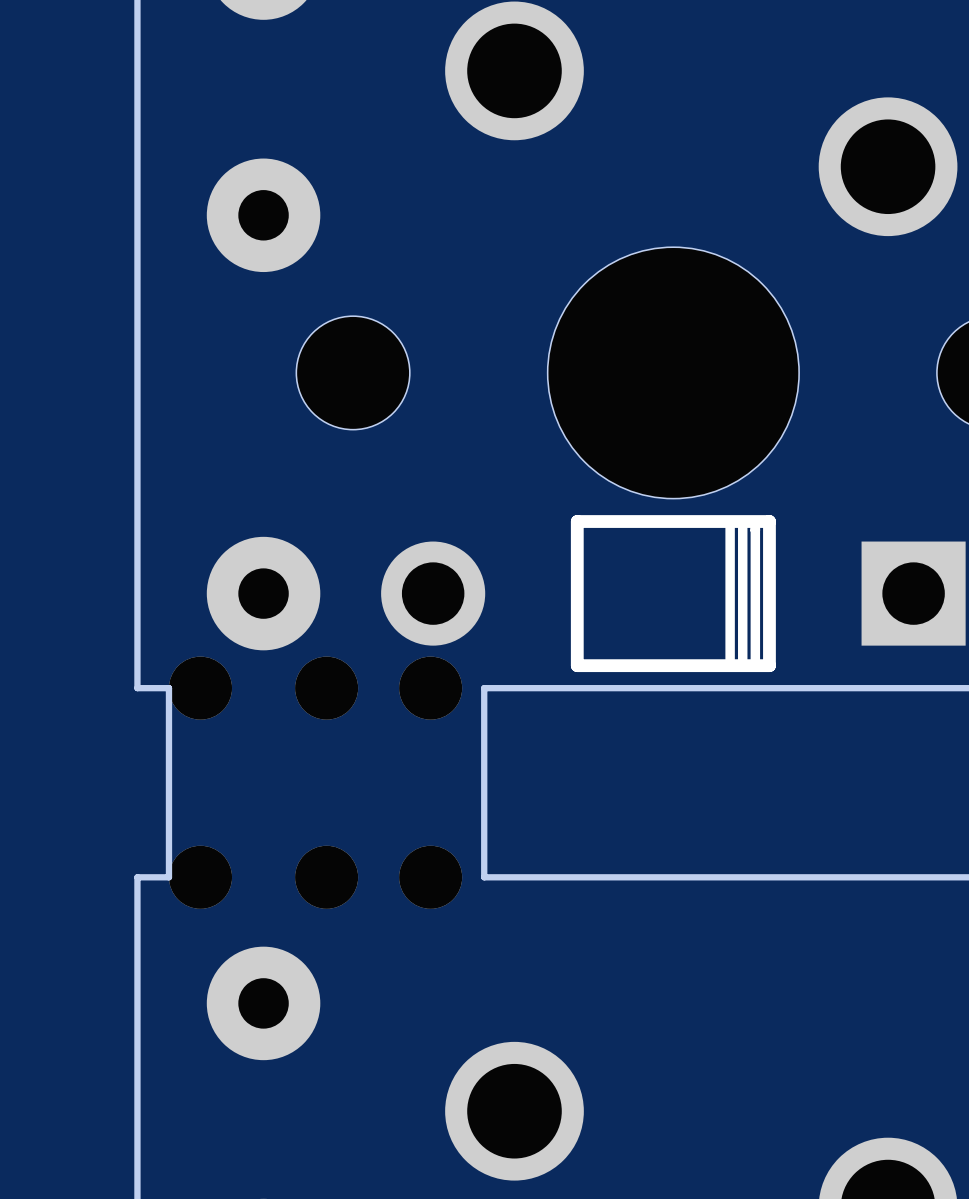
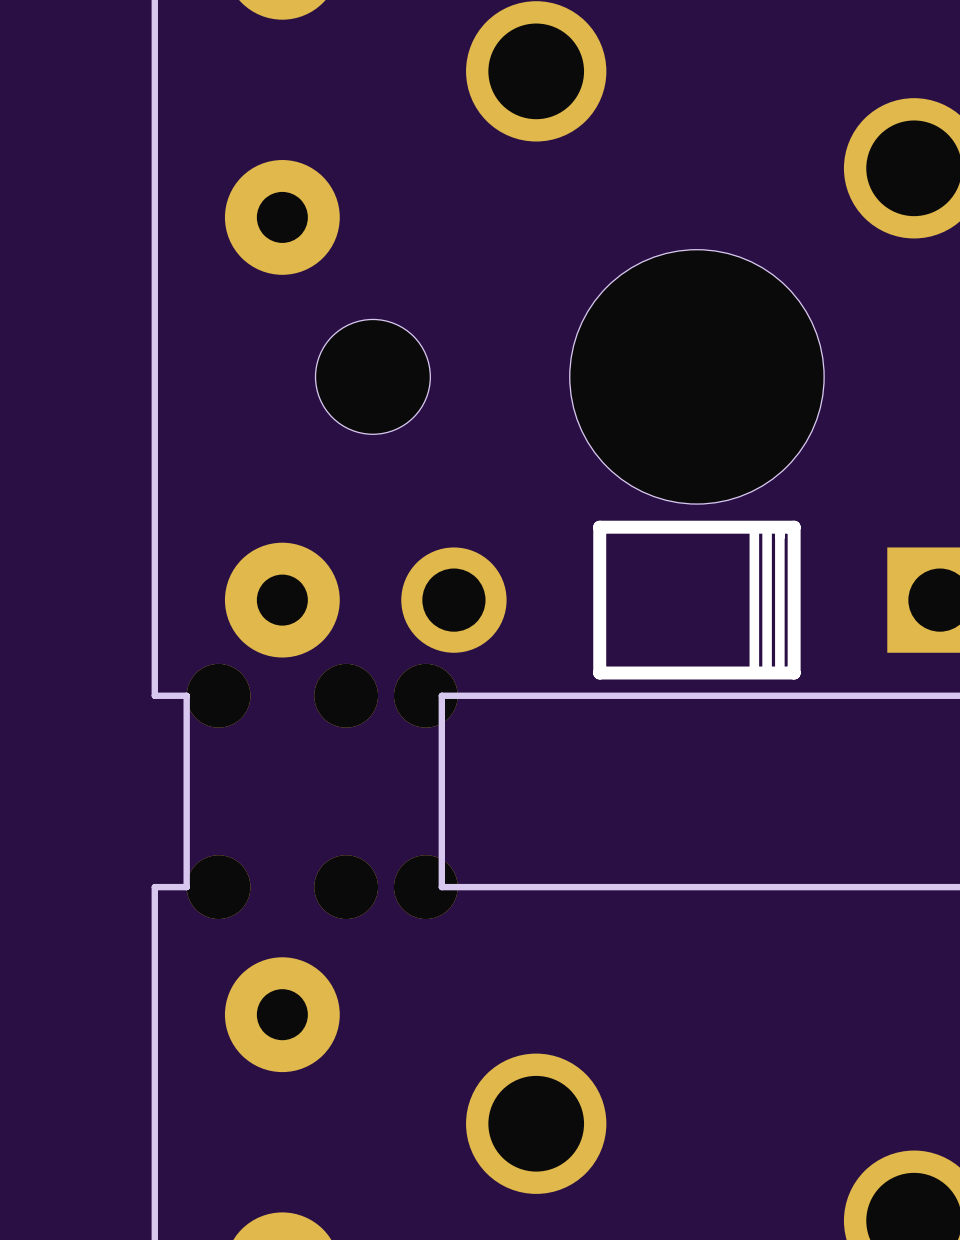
part footprint: [168, 656, 463, 720] -> [186, 663, 458, 728]
board edge: (484, 688) (484, 877) -> (505, 695) (441, 695) (441, 887) (505, 887)
part footprint: [168, 845, 463, 909] -> [186, 855, 458, 920]

